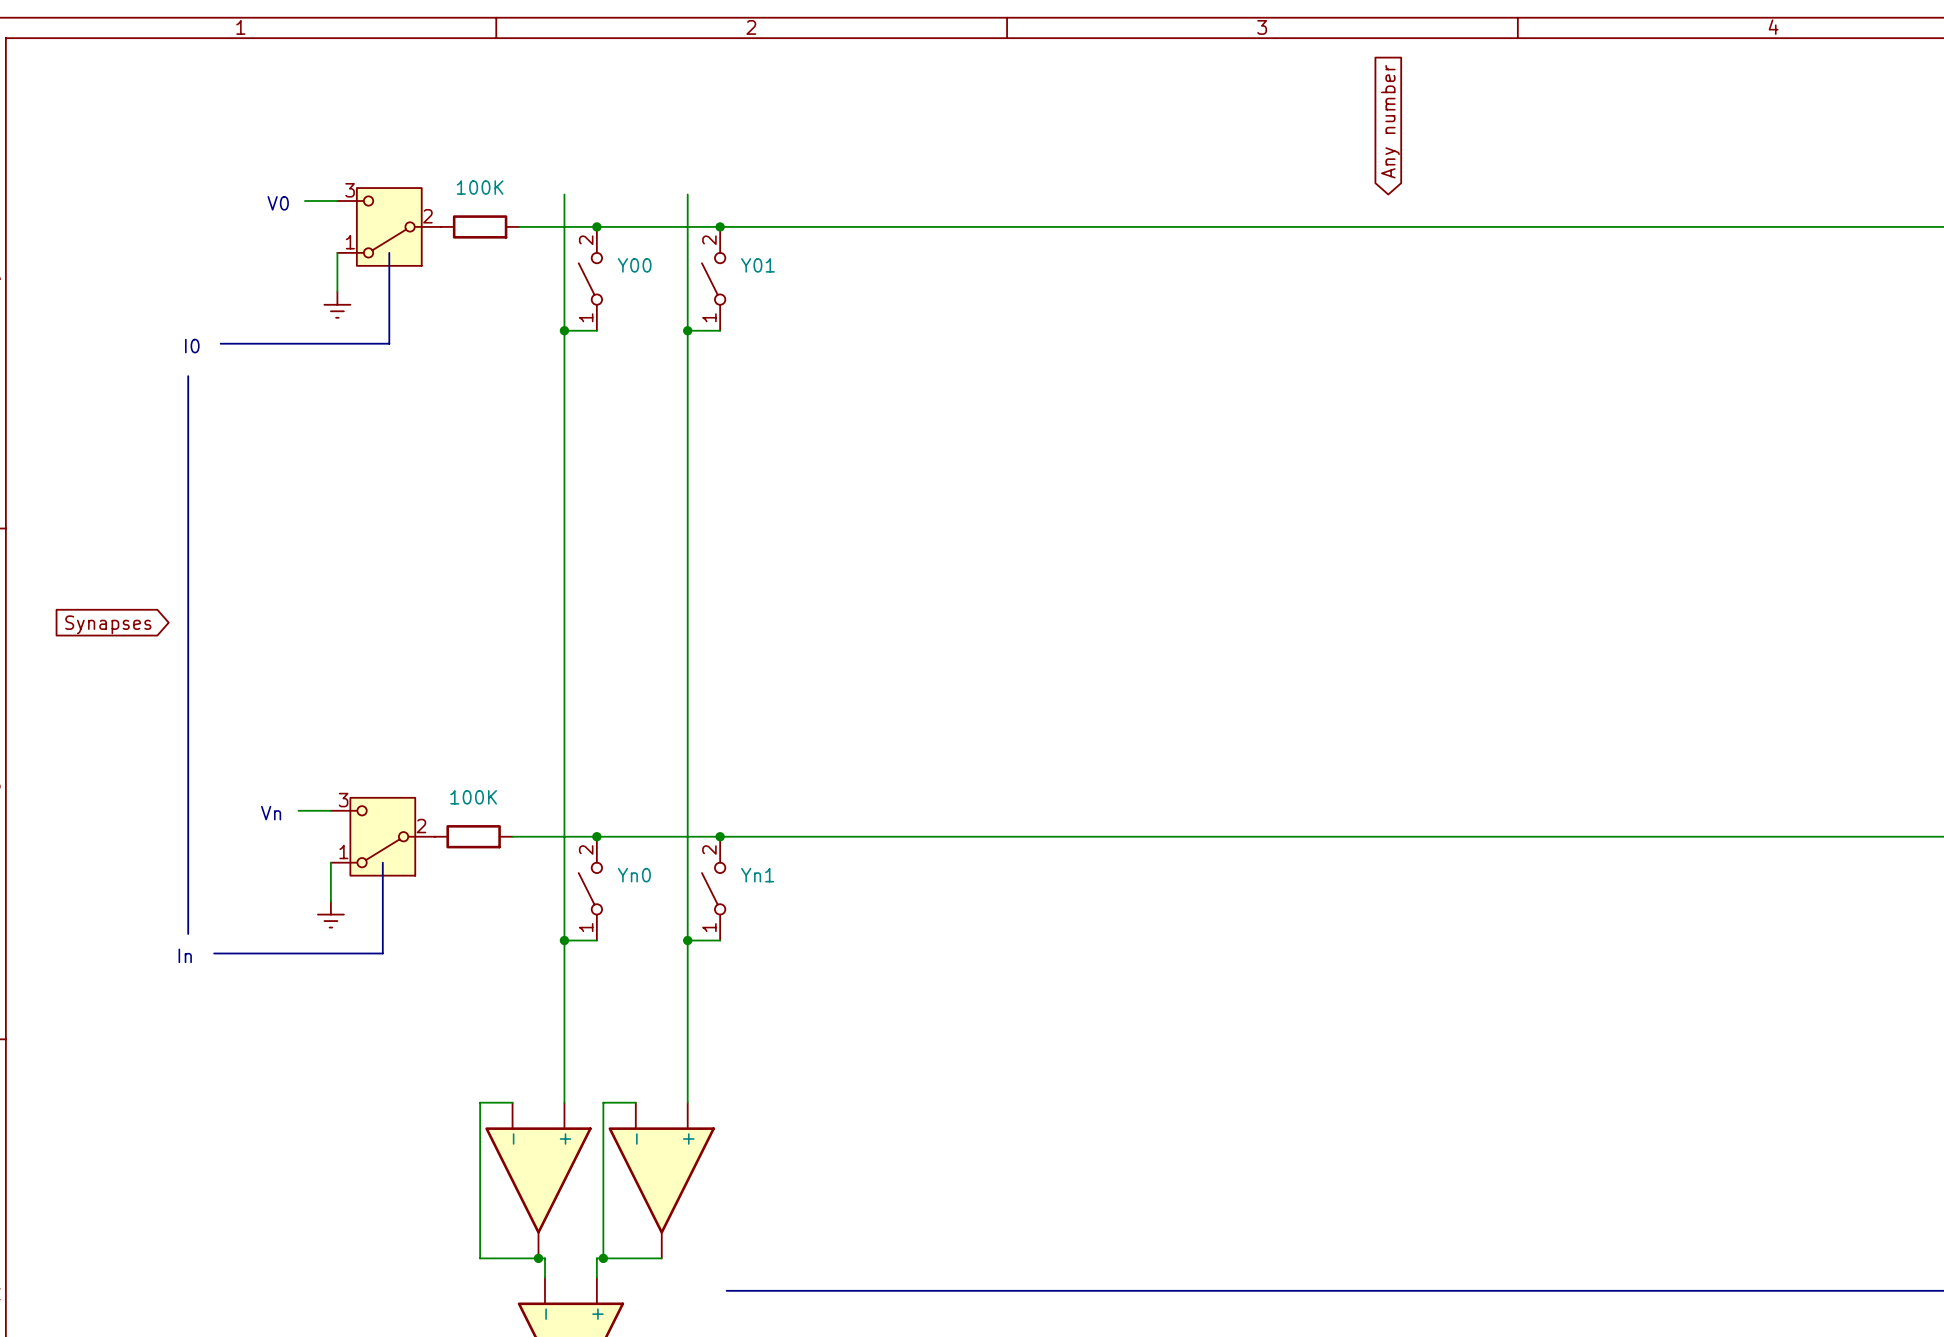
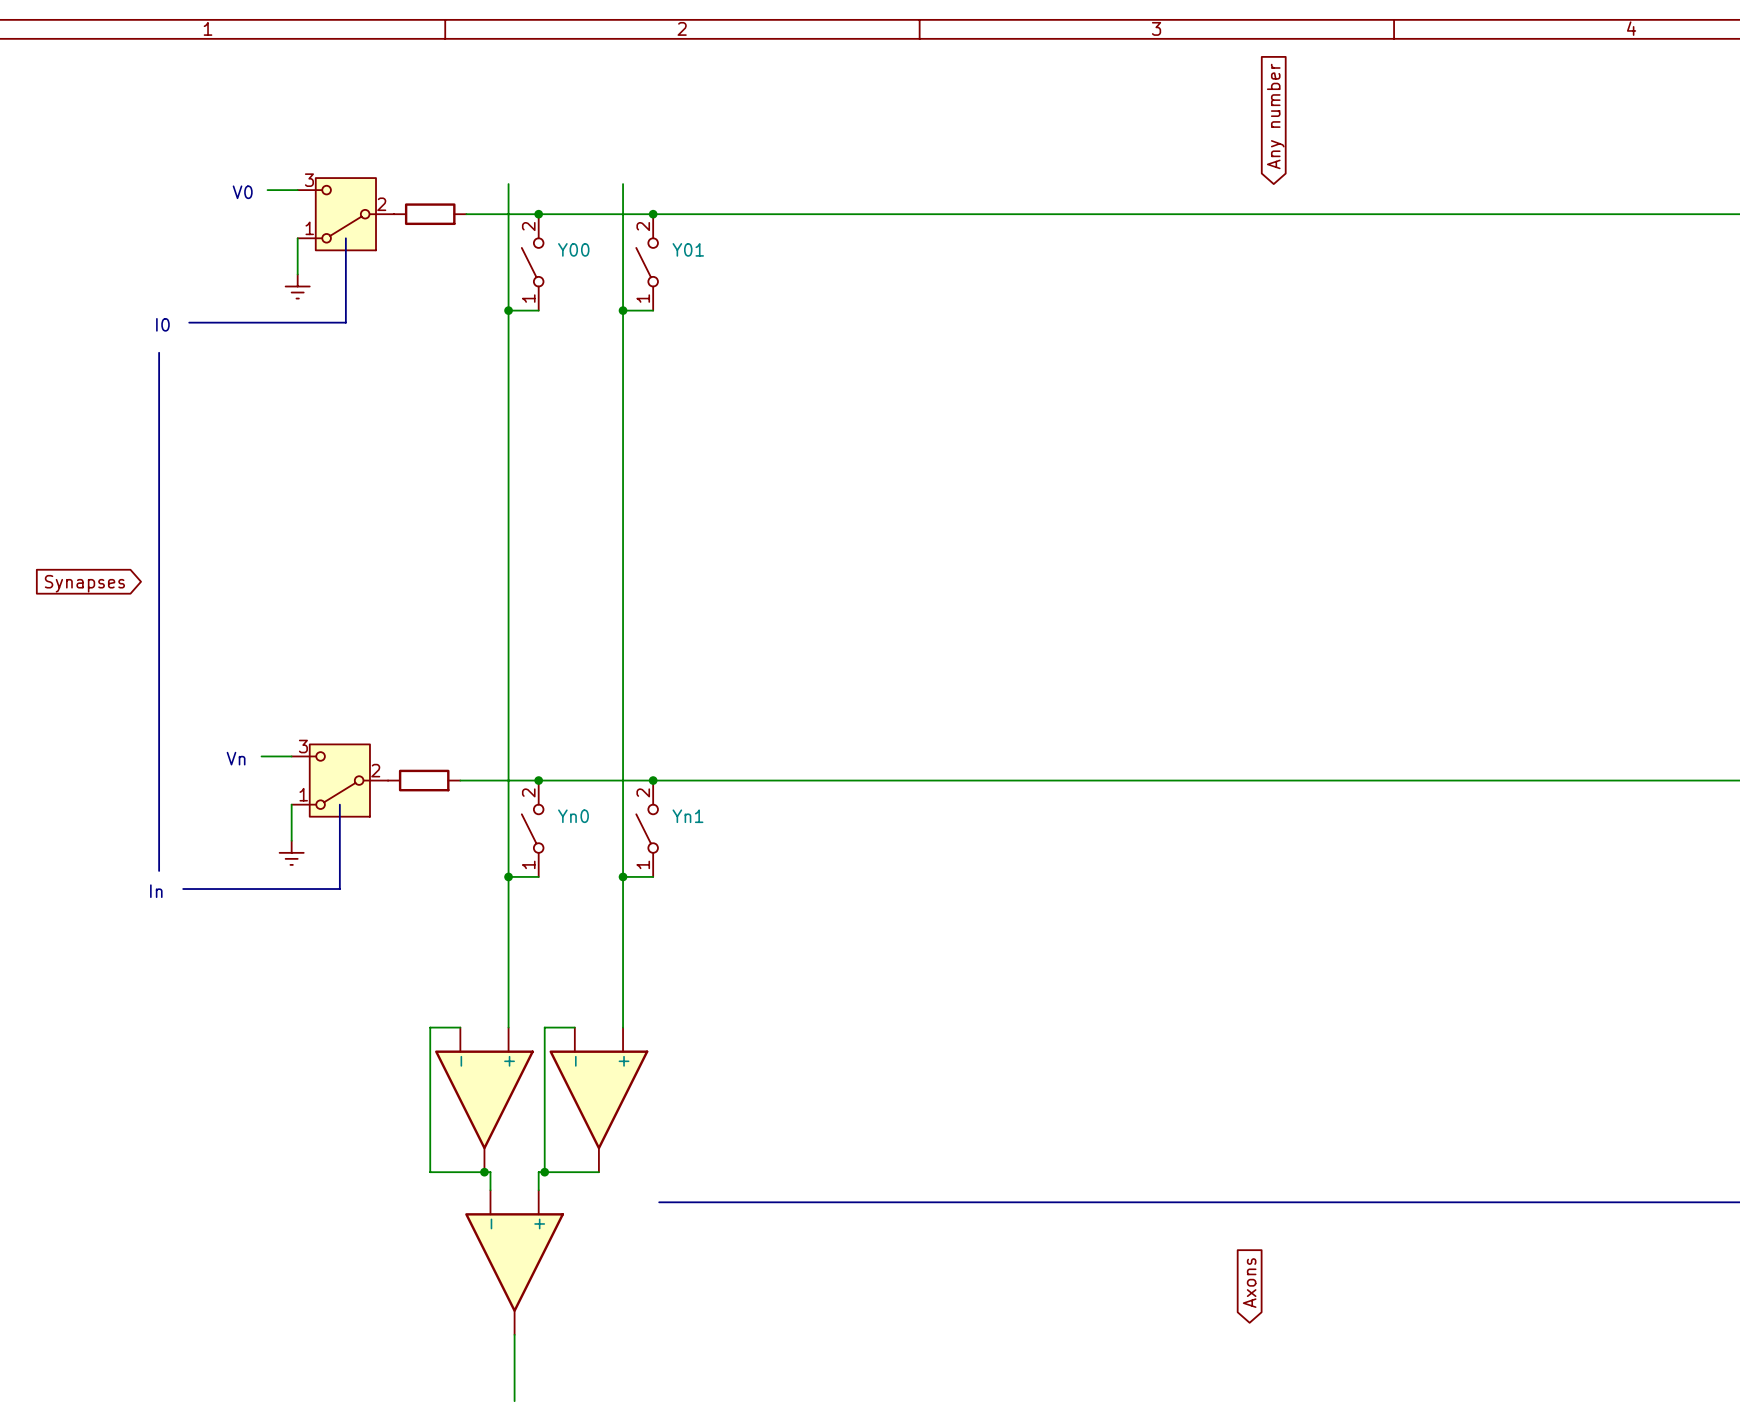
part value: 100K (480, 187) -> none
part value: 100K (473, 797) -> none

